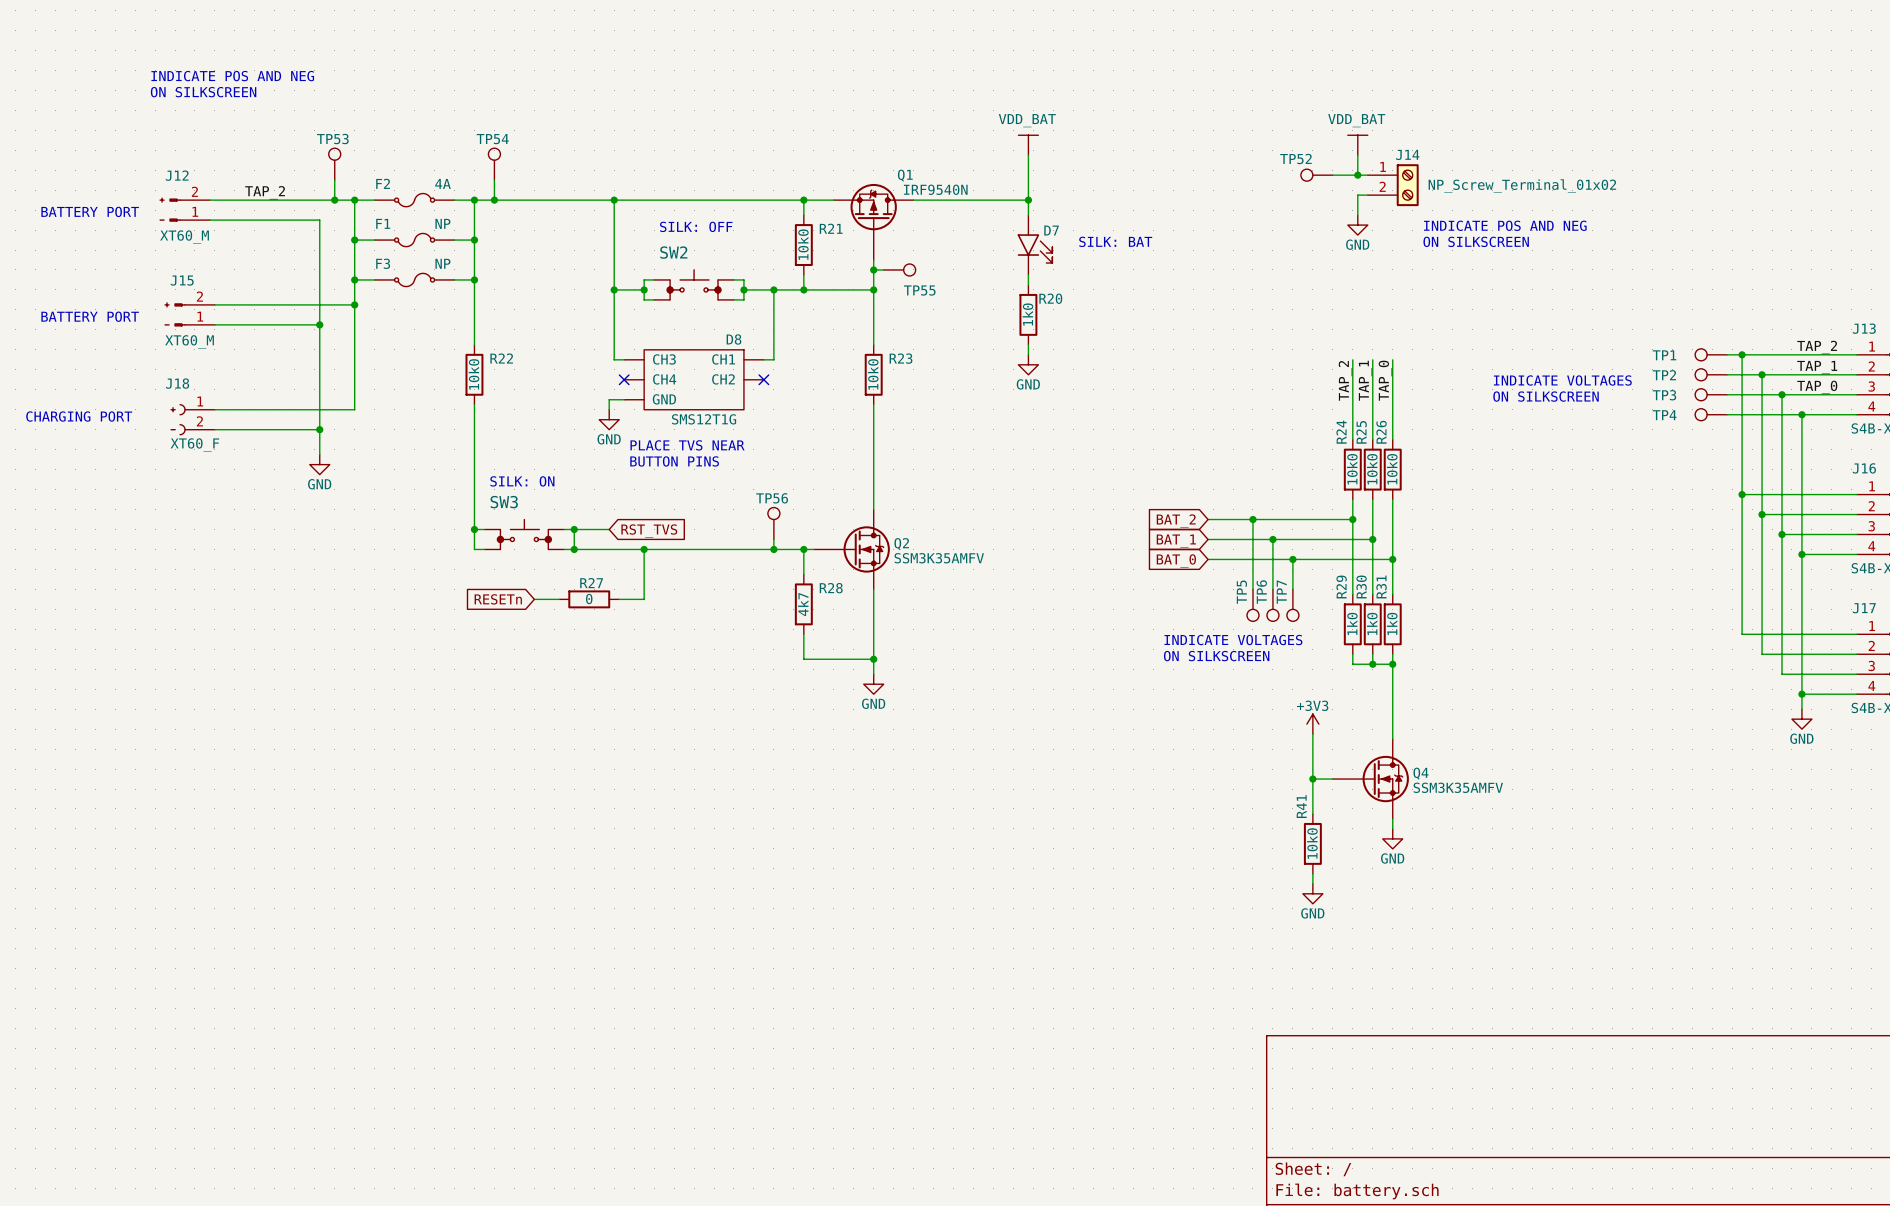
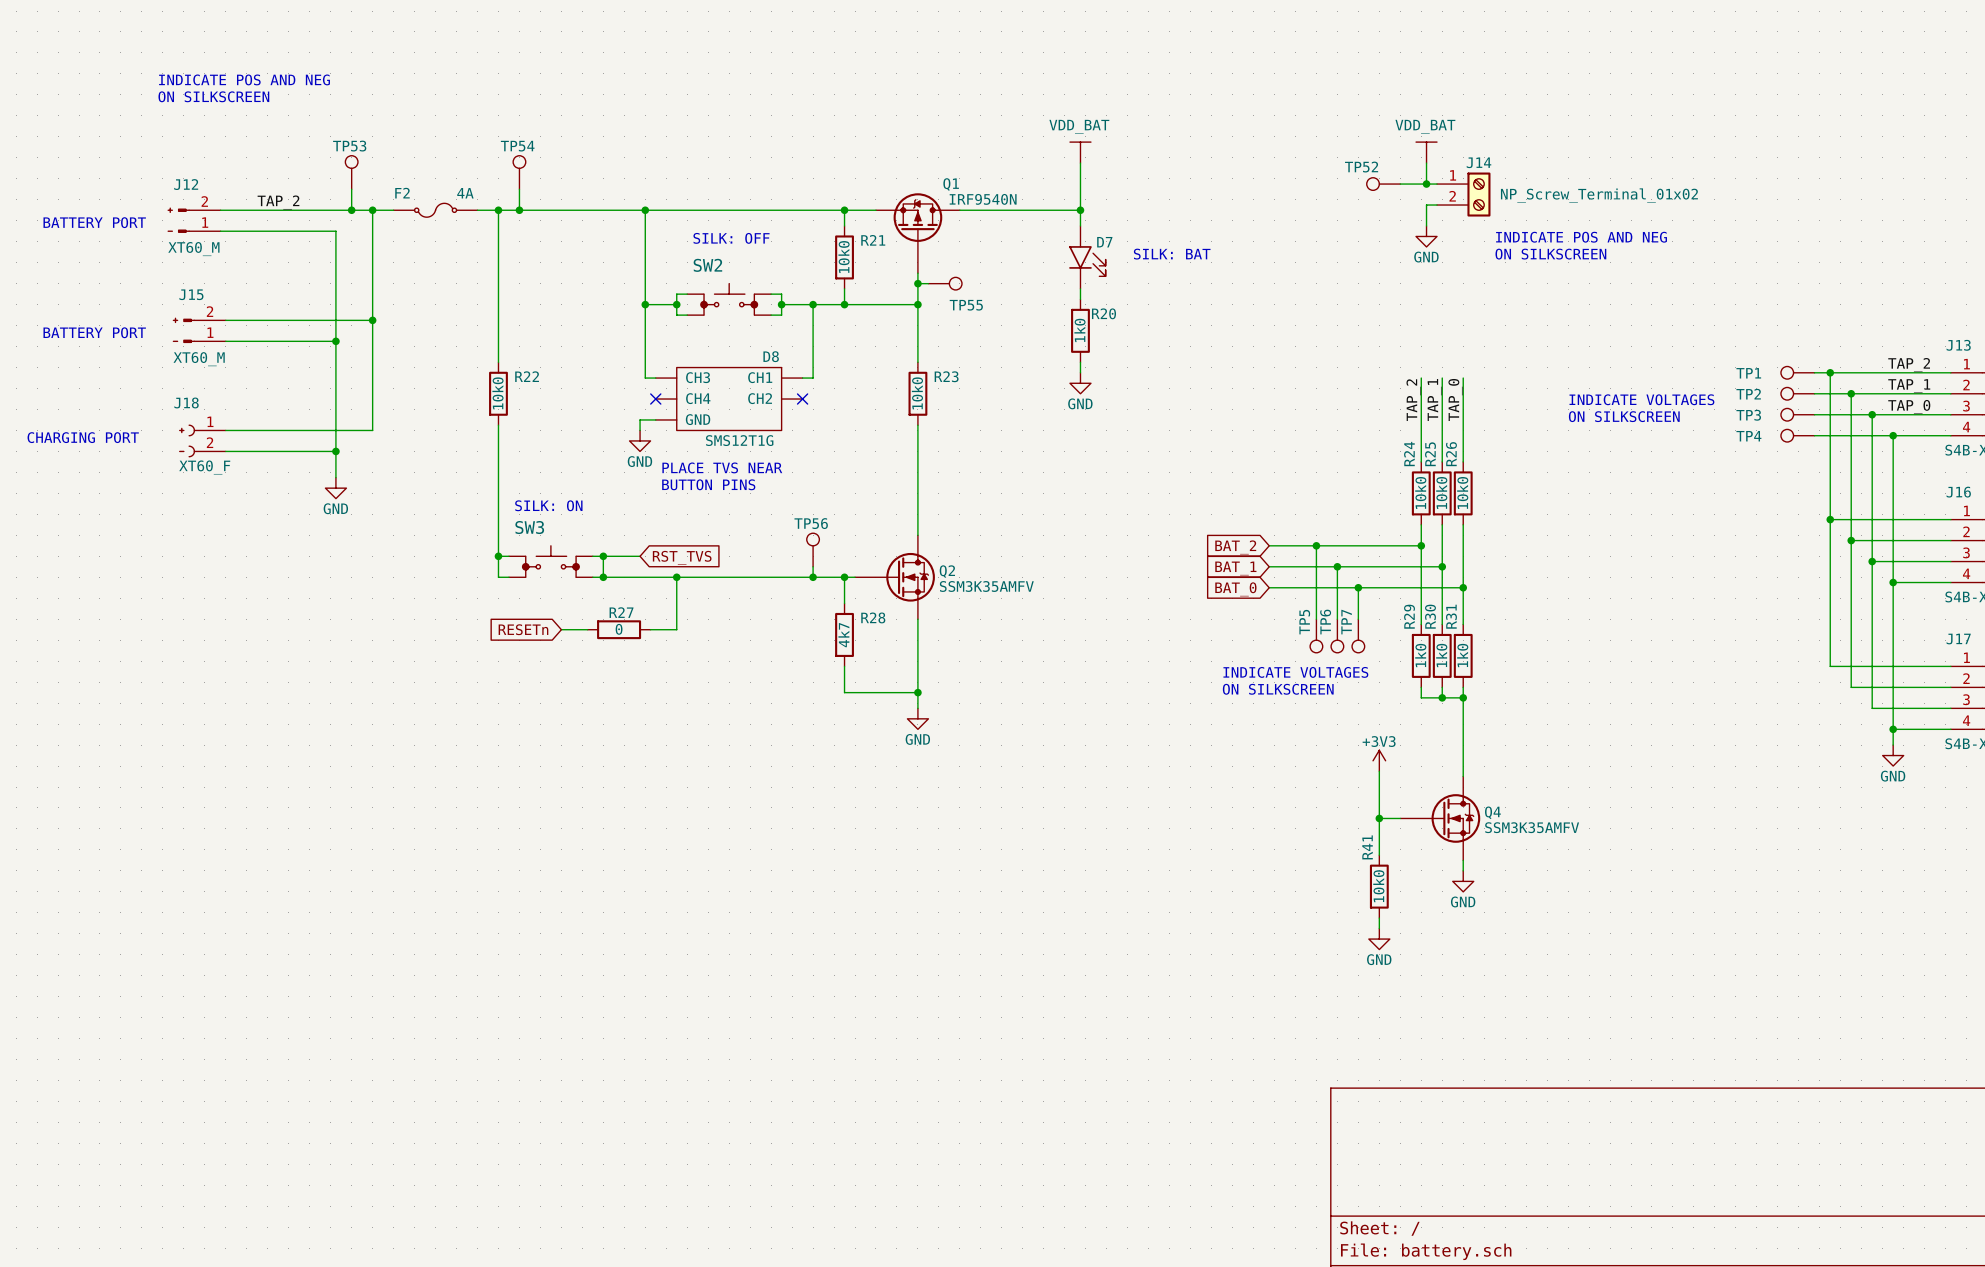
wire: (354, 240) (374, 240) -> none
junction: (354, 240) -> none
F1: (414, 240) -> none
wire: (454, 240) (474, 240) -> none
junction: (474, 240) -> none
wire: (354, 279) (374, 279) -> none
junction: (354, 279) -> none
F3: (414, 279) -> none
wire: (454, 279) (474, 279) -> none
junction: (474, 279) -> none

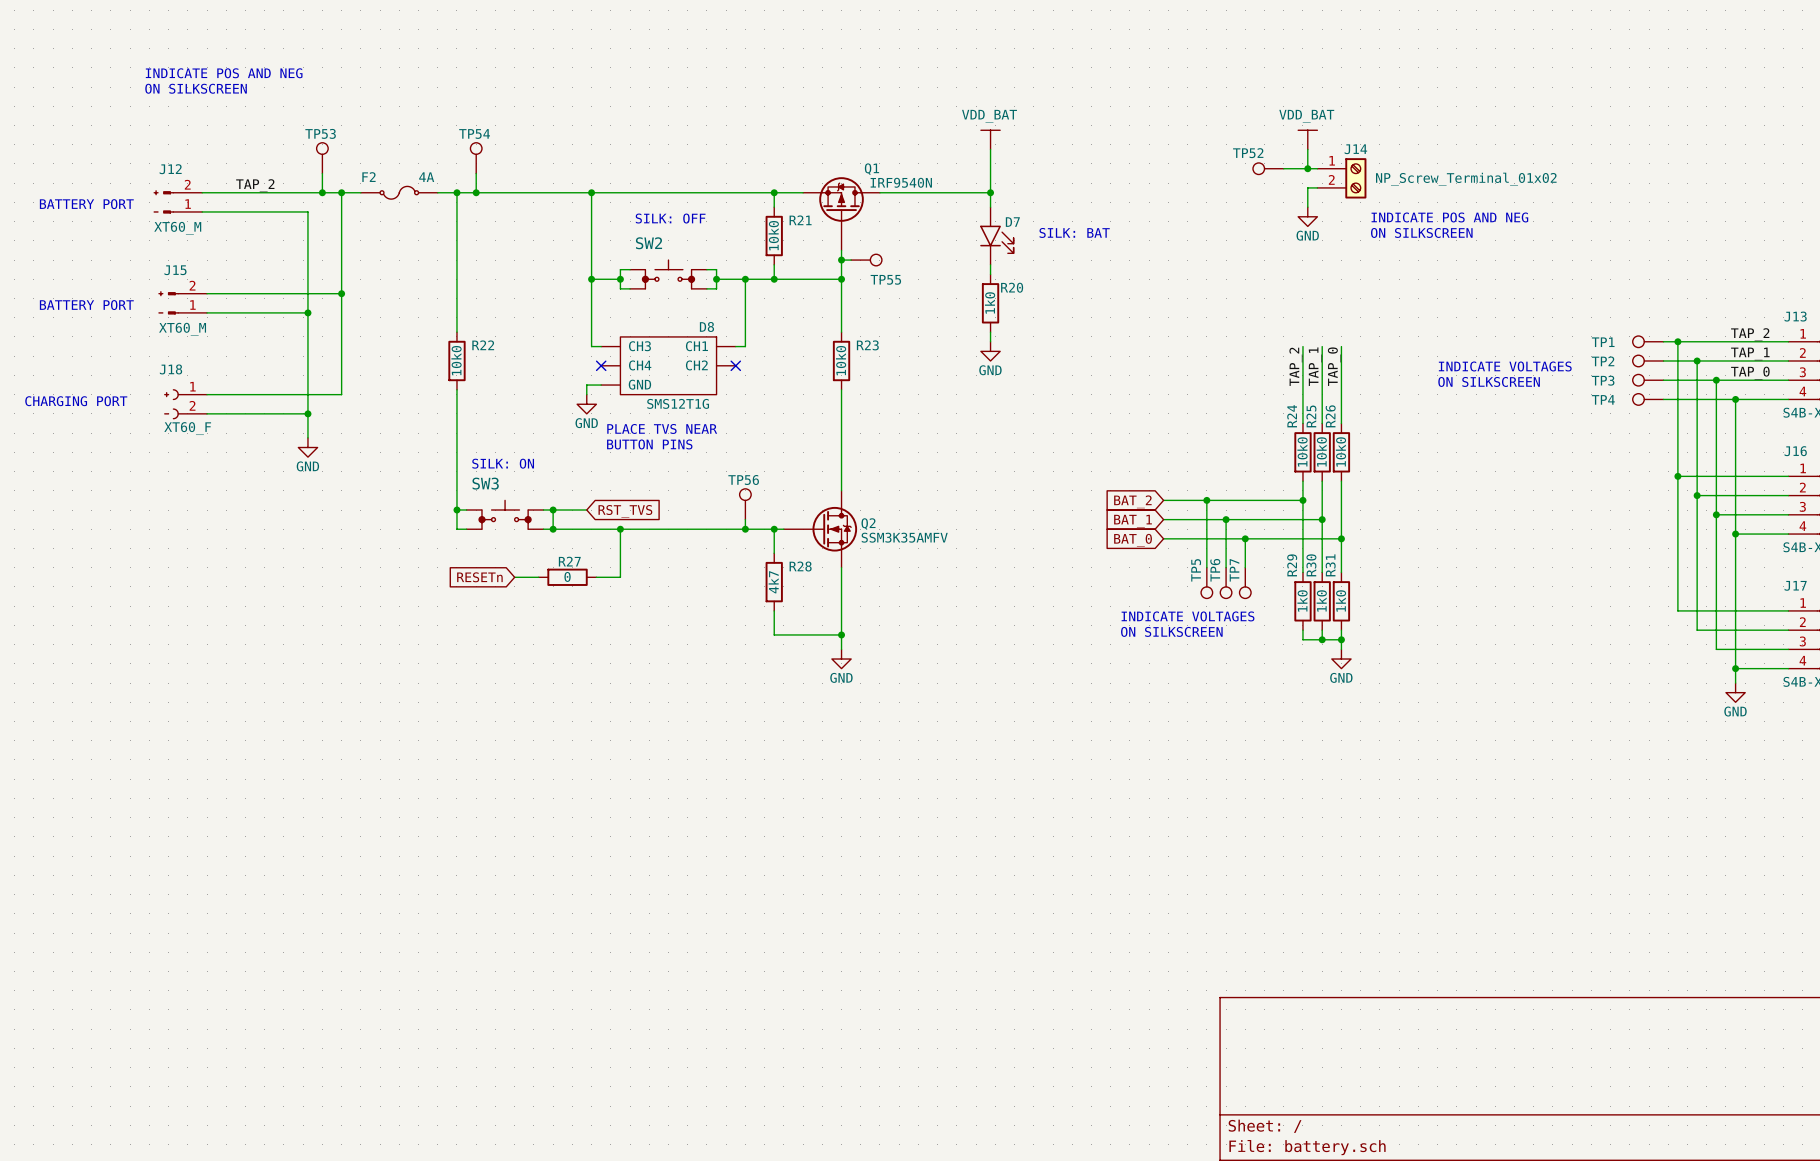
wire: (1463, 708) (1463, 776) -> none
power symbol: none -> GND (1341, 659)
power symbol: +3V3 (1379, 760) -> none
wire: (1379, 771) (1379, 855) -> none
wire: (1379, 818) (1400, 818) -> none
junction: (1379, 818) -> none
Q4: SSM3K35AMFV (1440, 818) -> none
wire: (1463, 860) (1463, 870) -> none
power symbol: GND (1463, 881) -> none
R41: (1379, 886) -> none
wire: (1379, 918) (1379, 928) -> none
power symbol: GND (1379, 939) -> none

